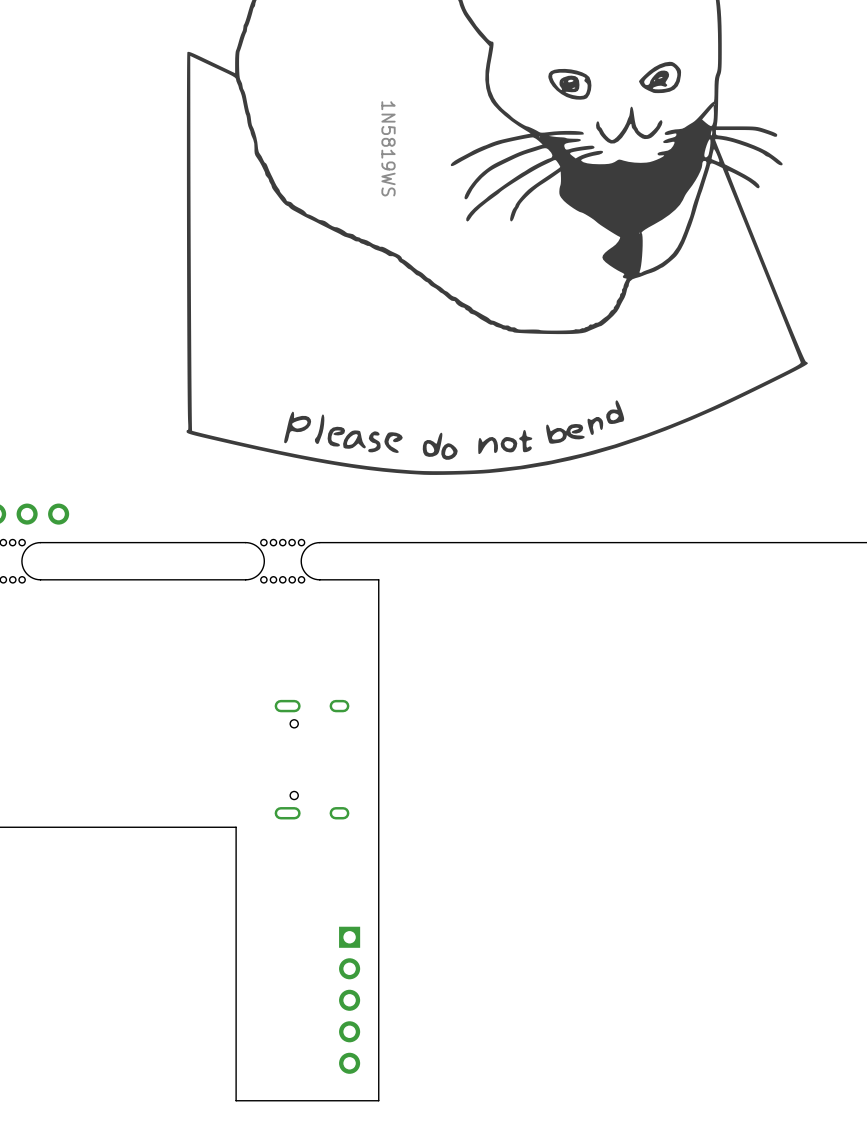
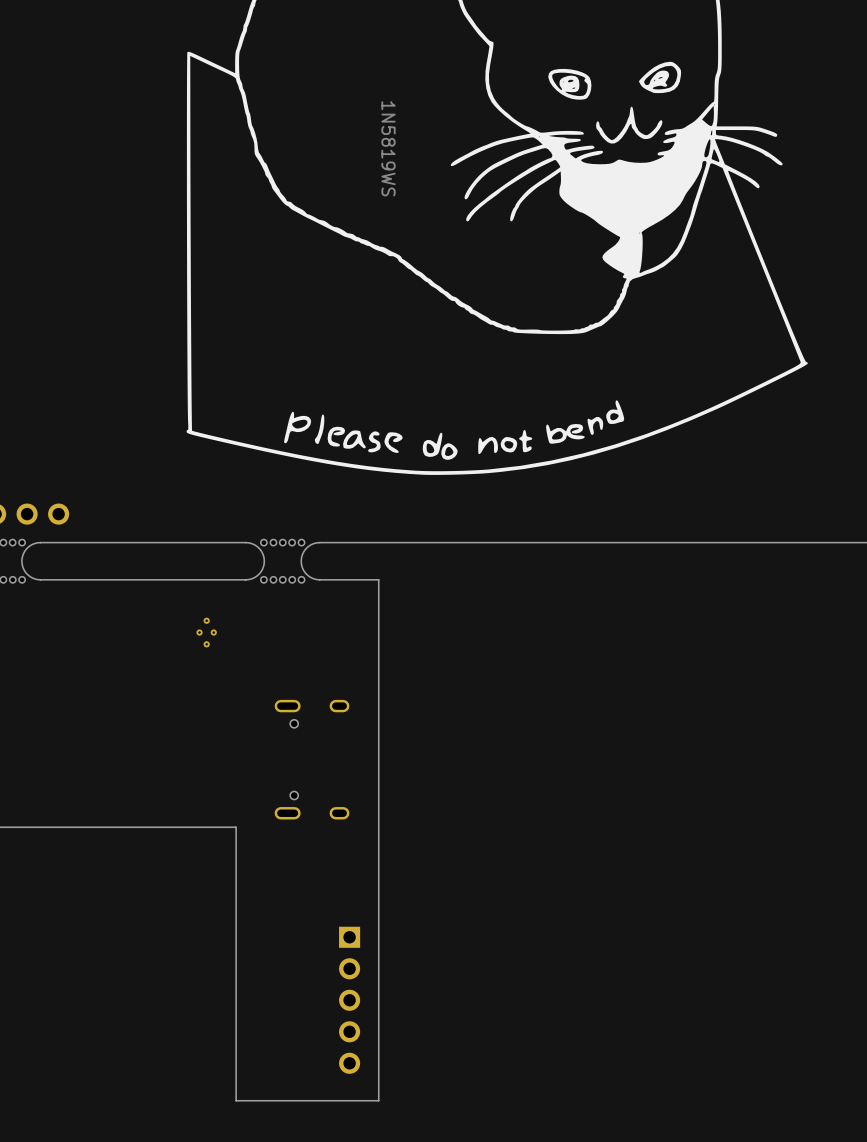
part: none -> (206, 632)

